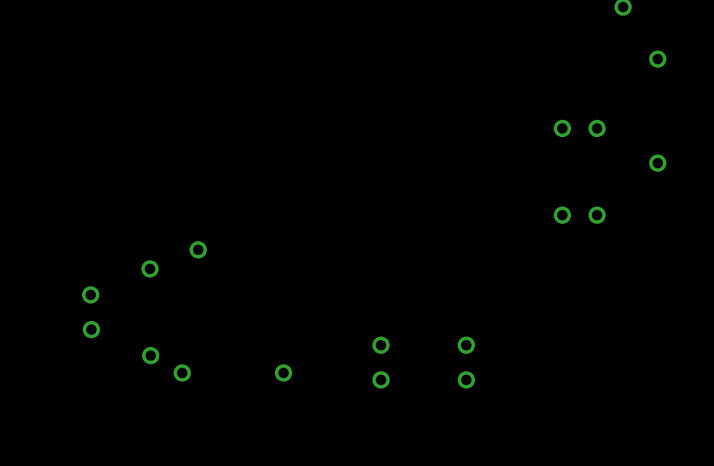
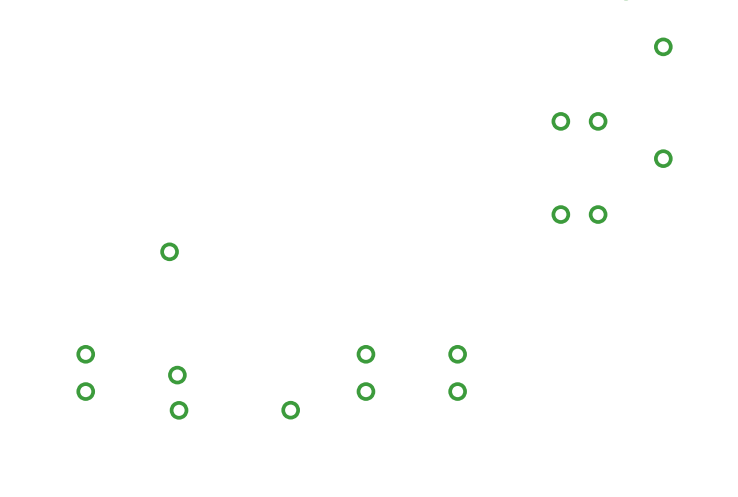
via: (150, 268) -> none
via: (90, 294) -> none
via: (91, 329) -> none
via: none -> (85, 354)
via: (150, 355) -> none
via: none -> (177, 375)
via: (182, 372) -> none
via position: (283, 372) -> (290, 410)
via: none -> (85, 391)
via: none -> (179, 410)

